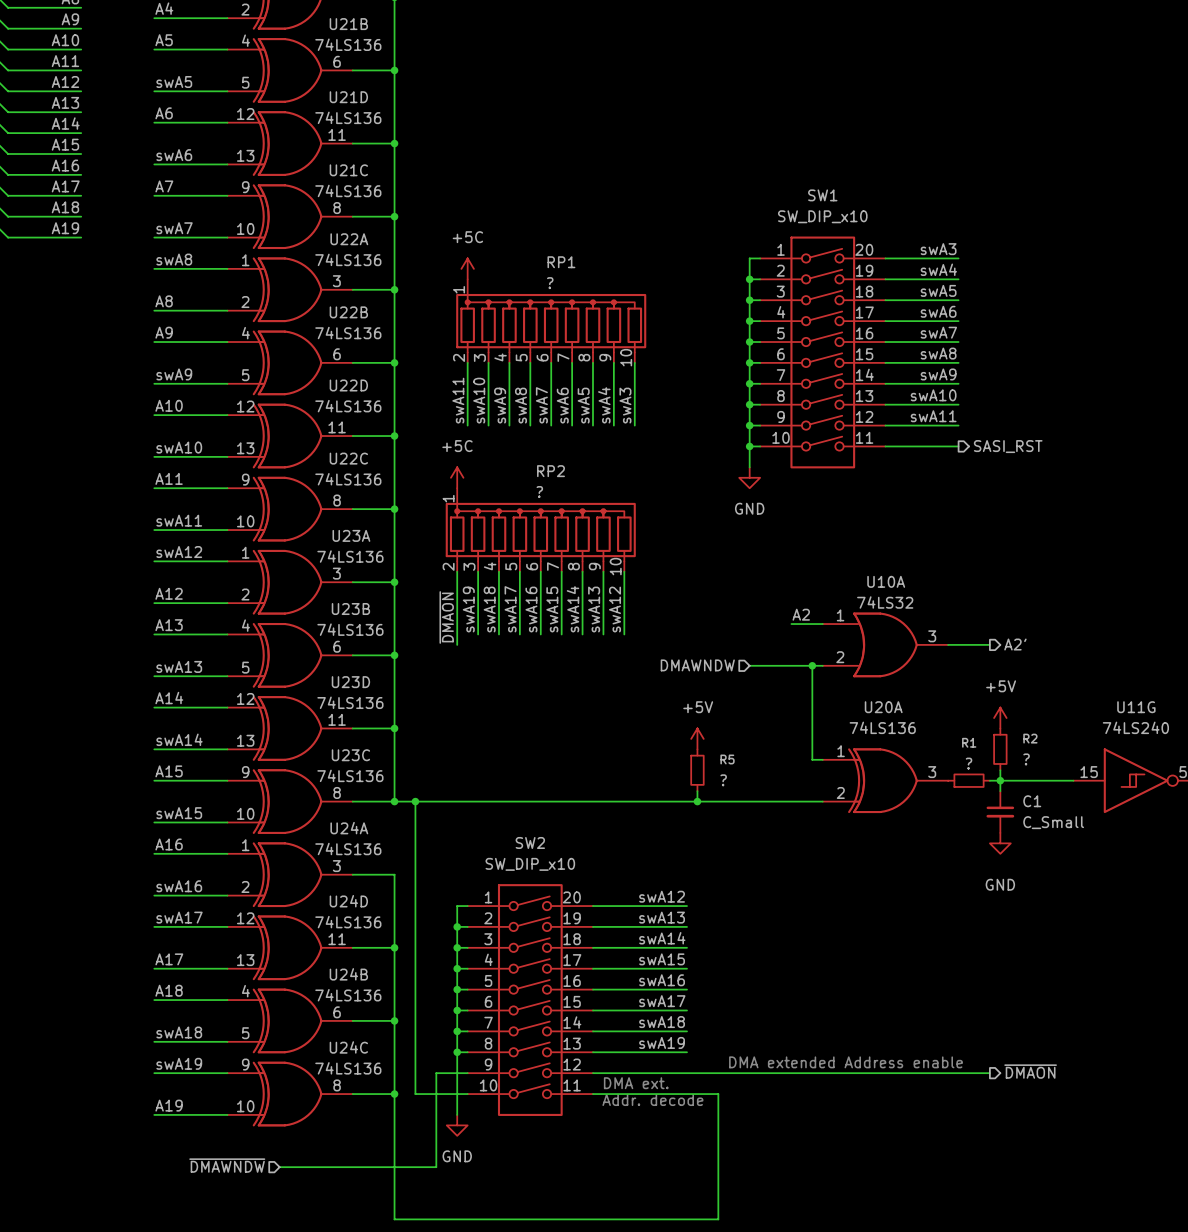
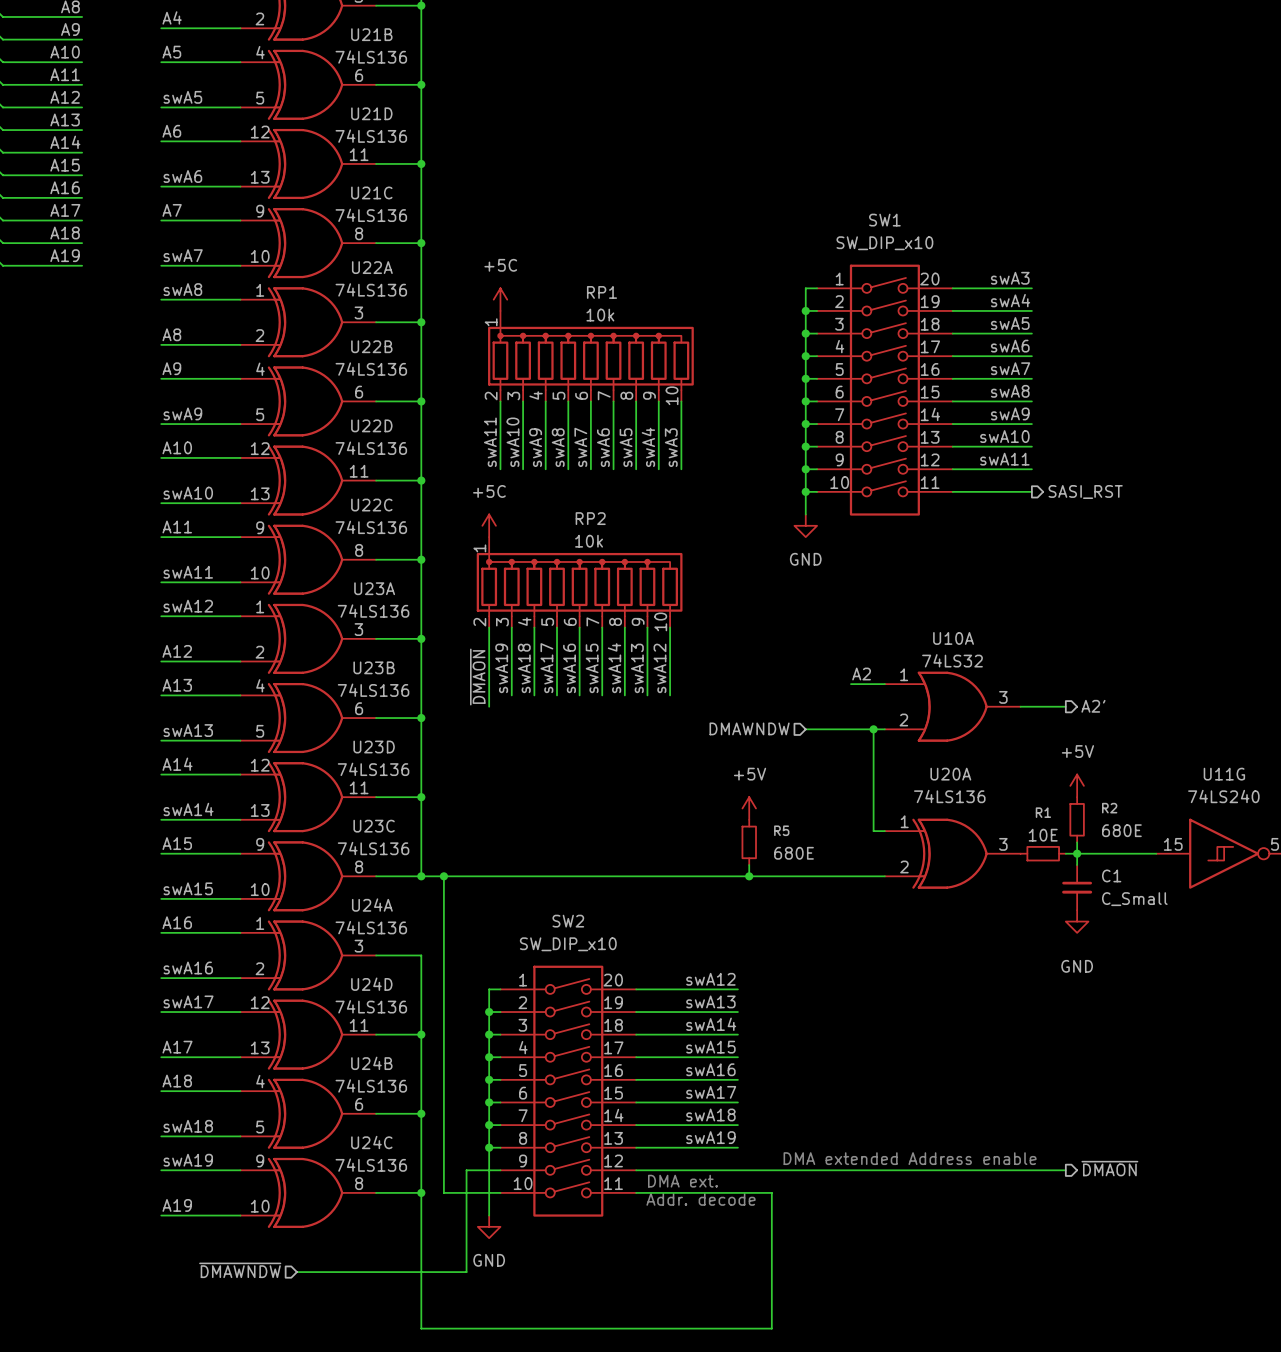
RP1 value: ? (550, 283) -> 10k (600, 315)
RP2 value: ? (539, 492) -> 10k (589, 541)
R2 value: ? (1026, 759) -> 680E (1121, 830)
R1 value: ? (969, 763) -> 10E (1043, 835)
R5 value: ? (723, 780) -> 680E (794, 853)

